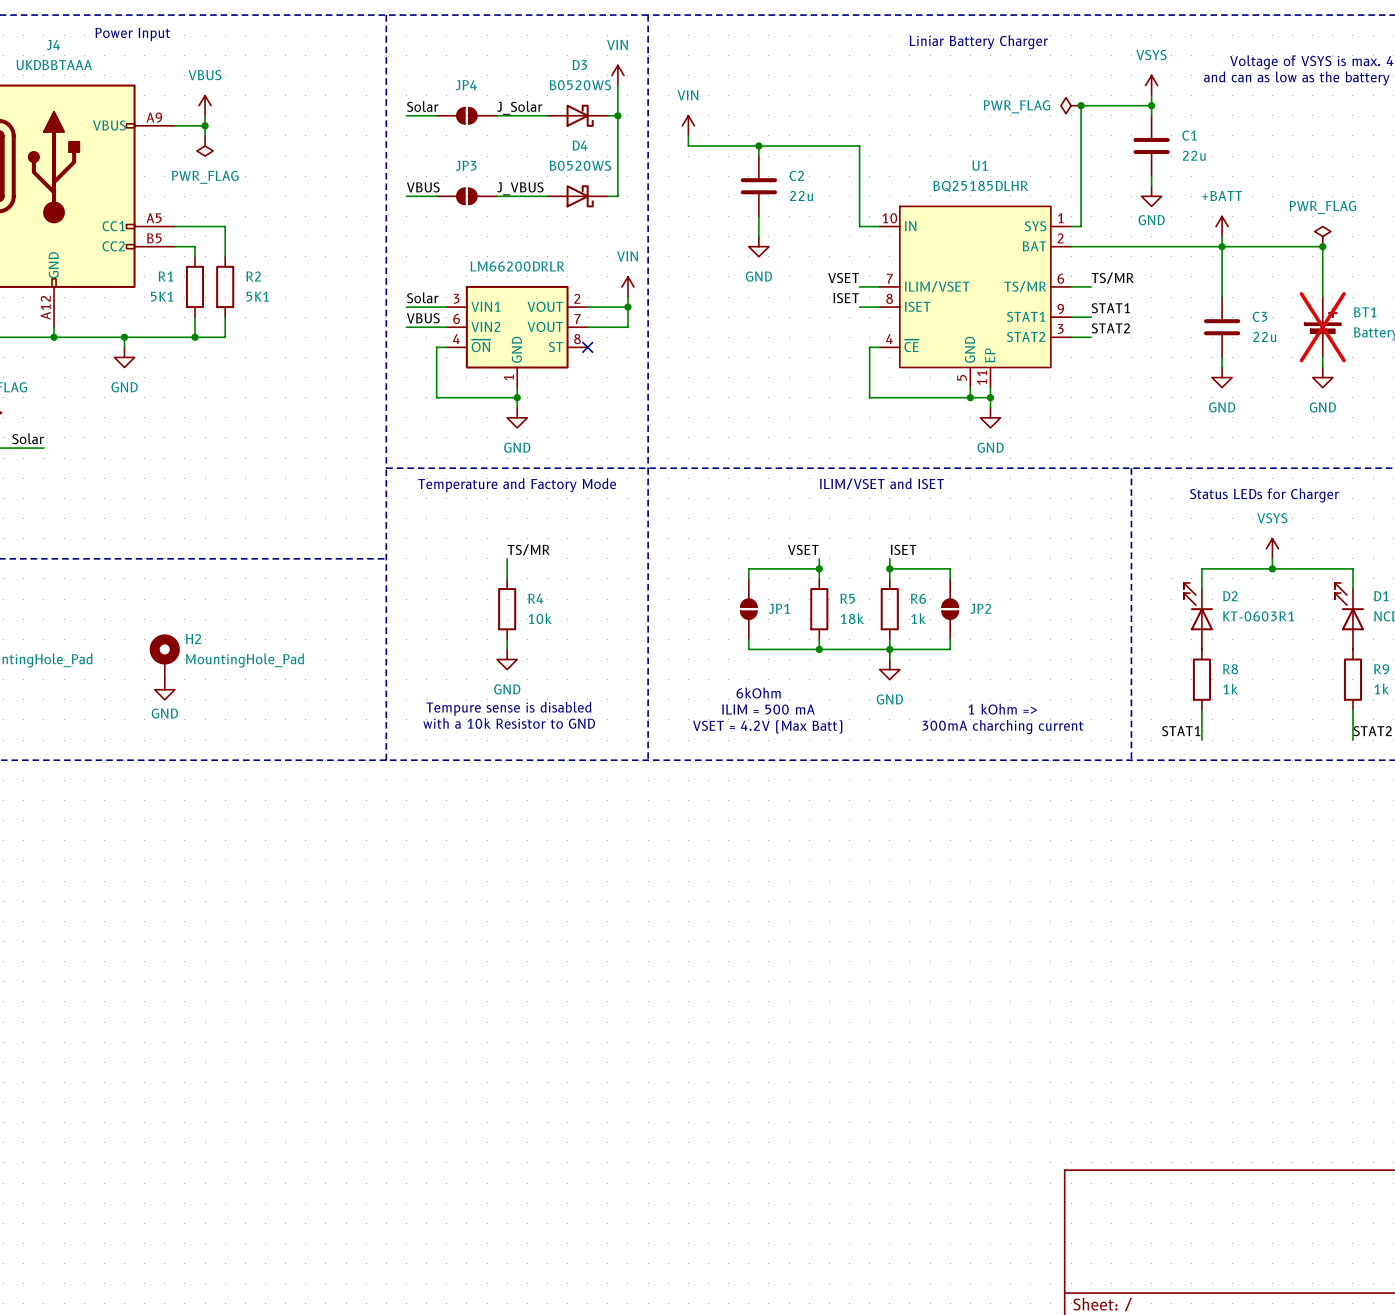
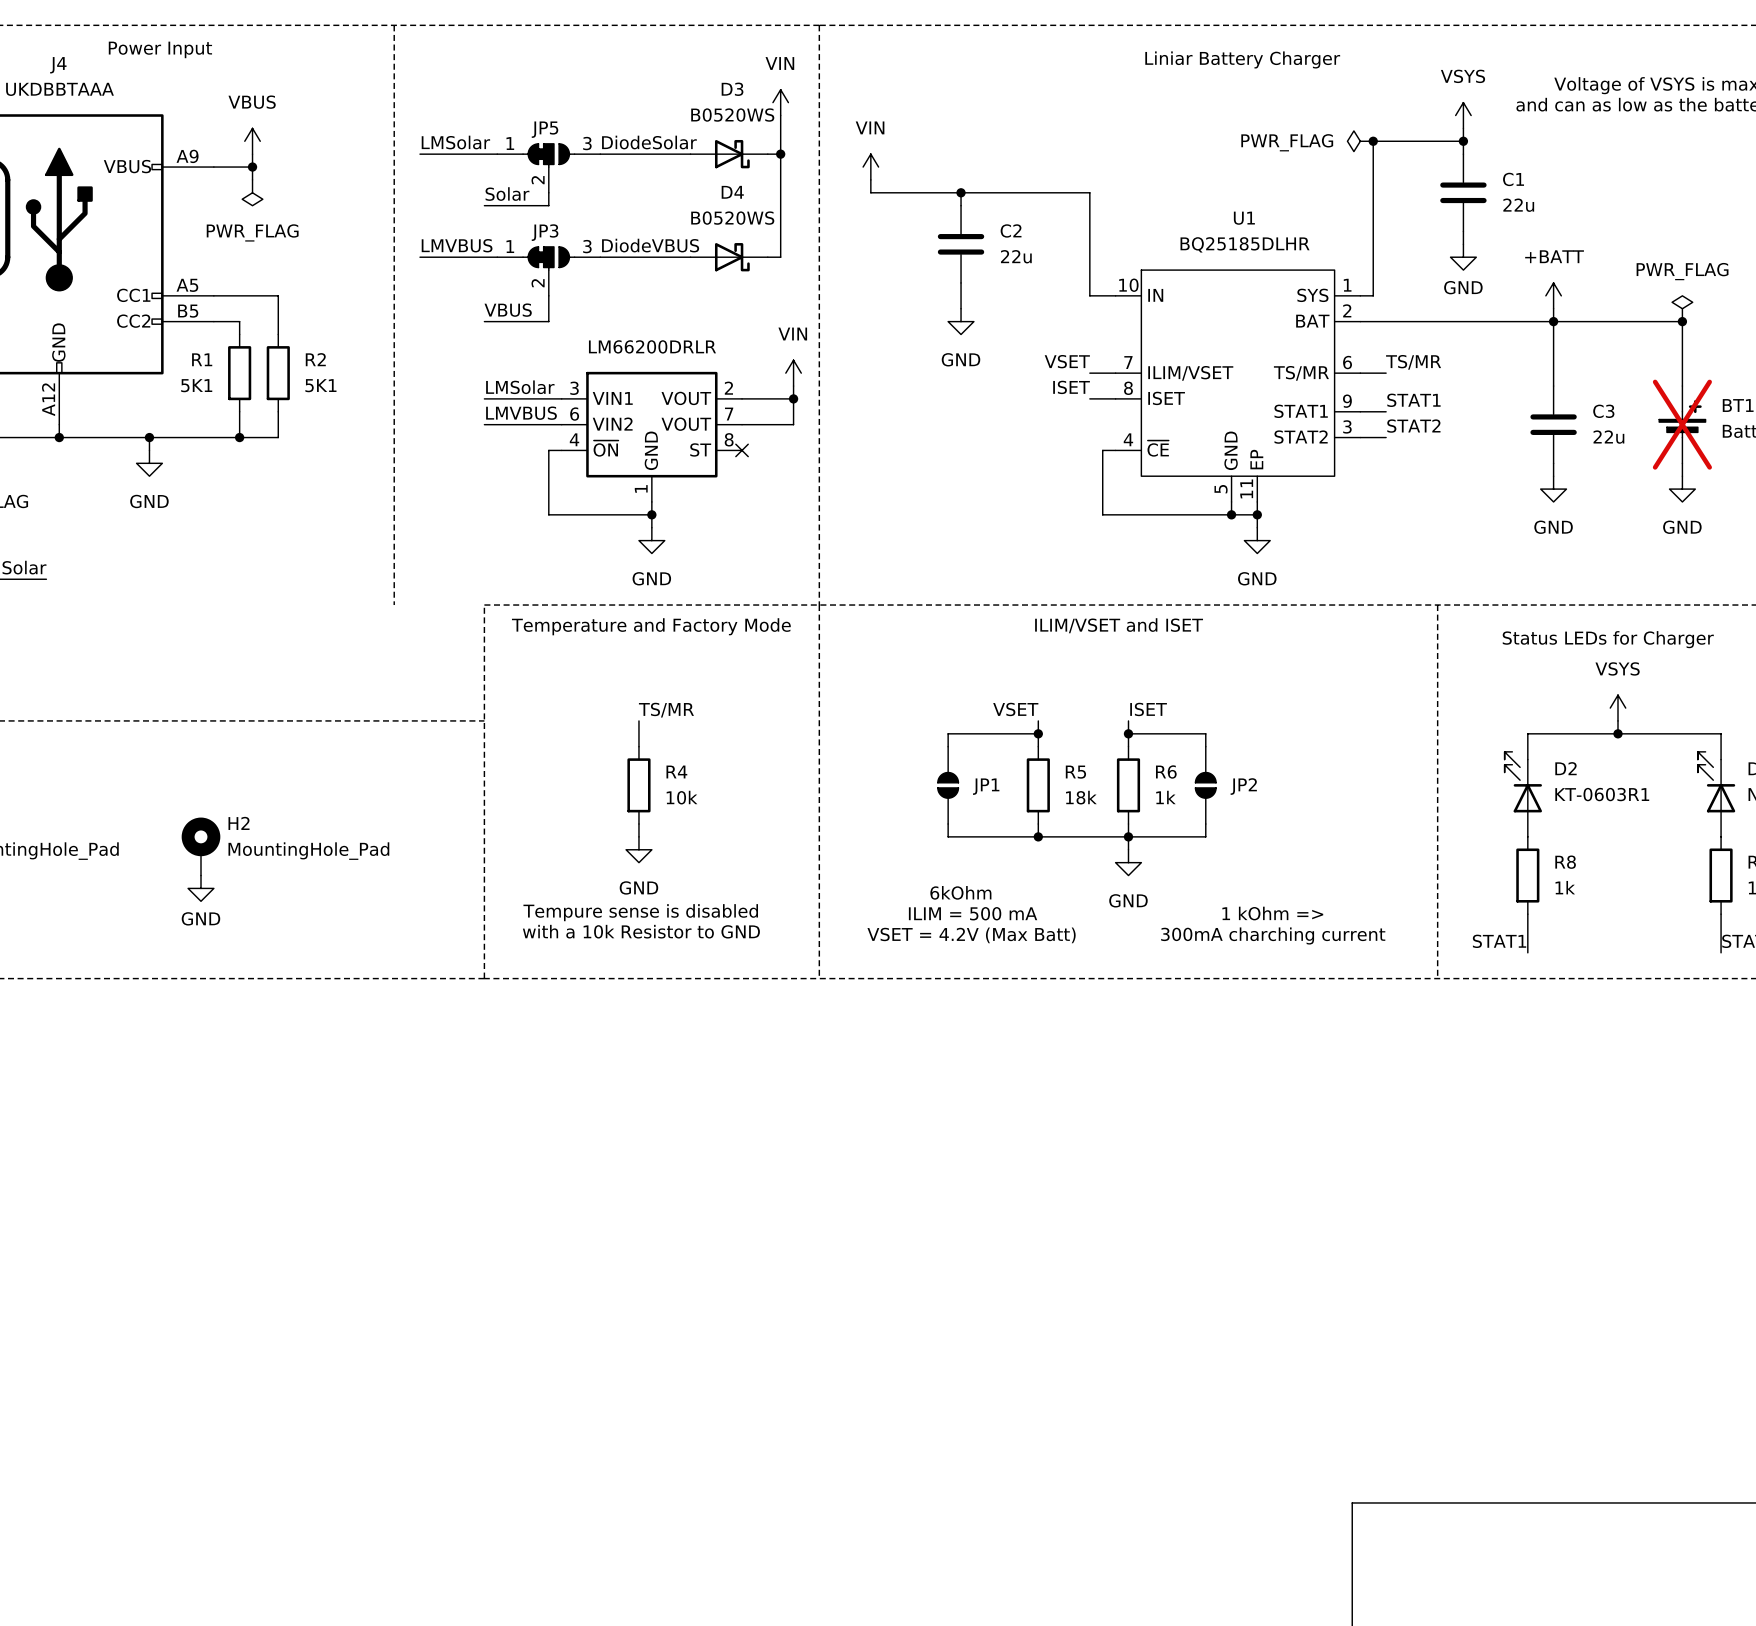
line: (386, 15) (386, 468) -> (394, 25) (394, 605)
label: none -> LMSolar (455, 142)
label position: Solar (422, 106) -> Solar (507, 194)
label: none -> DiodeSolar (649, 142)
label: J_Solar (519, 107) -> none
wire: none -> (419, 154) (497, 154)
JP4: (466, 115) -> none
JP5: none -> (548, 168)
wire: none -> (548, 192) (548, 205) (484, 205)
label: none -> LMVBUS (457, 245)
label: VBUS (423, 187) -> none
label: none -> DiodeVBUS (650, 245)
JP3 symbol: [436, 188, 498, 205] -> [497, 246, 601, 296]
label: J_VBUS (520, 188) -> none
wire: none -> (419, 257) (497, 257)
wire: none -> (548, 295) (548, 321) (484, 321)
label: none -> VBUS (508, 310)
label: Solar (422, 297) -> LMSolar (520, 387)
wire: none -> (484, 398) (510, 398)
label: VBUS (423, 318) -> LMVBUS (521, 413)
wire: none -> (484, 424) (510, 424)

